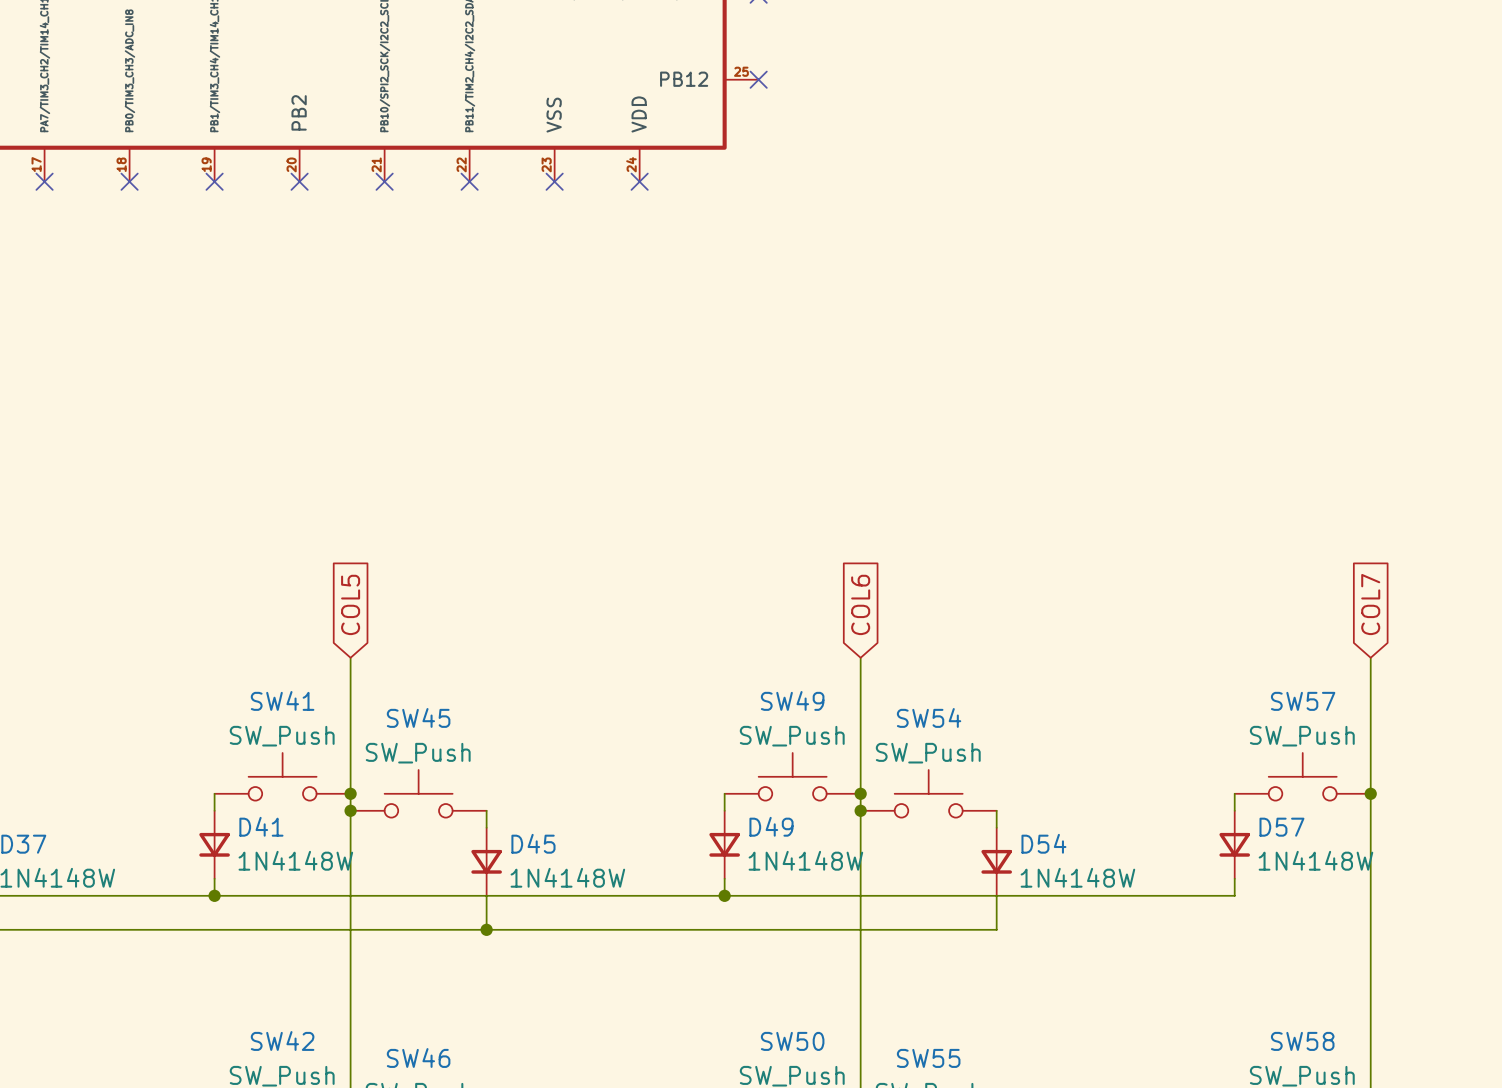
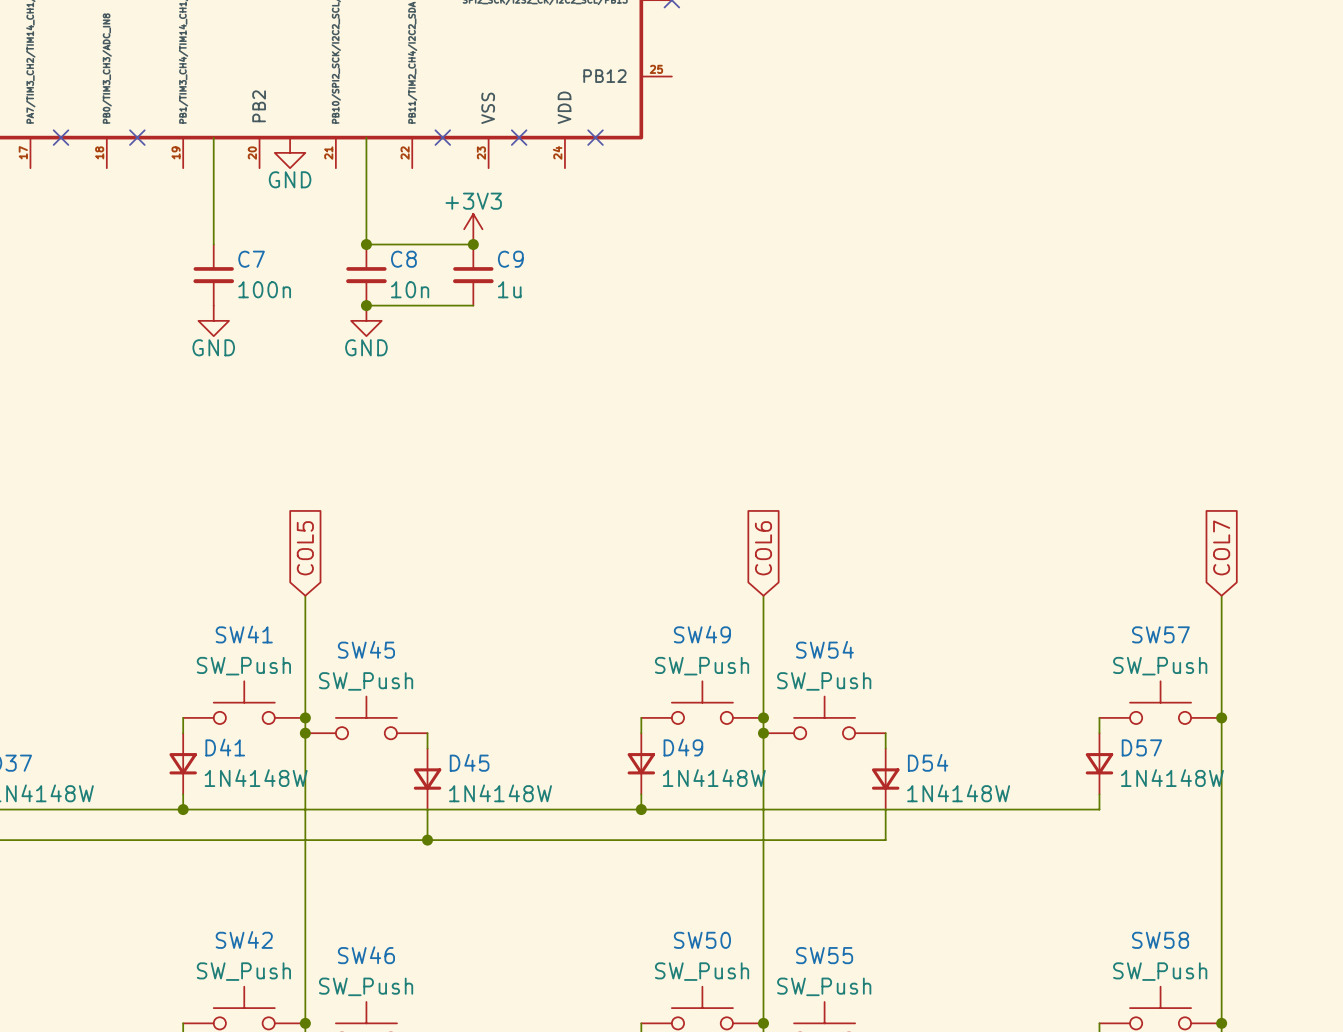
no-connect mark: (758, 79) -> none
no-connect mark: none -> (61, 137)
no-connect mark: none -> (137, 137)
wire: none -> (213, 137) (213, 244)
wire: none -> (366, 137) (366, 244) (473, 244)
no-connect mark: none -> (442, 137)
no-connect mark: none -> (519, 137)
no-connect mark: none -> (595, 137)
power symbol: none -> GND (290, 152)
no-connect mark: (44, 181) -> none
no-connect mark: (129, 181) -> none
no-connect mark: (214, 181) -> none
no-connect mark: (299, 181) -> none
no-connect mark: (384, 181) -> none
no-connect mark: (469, 181) -> none
no-connect mark: (554, 181) -> none
no-connect mark: (639, 181) -> none
power symbol: none -> +3V3 (473, 229)
junction: none -> (366, 244)
junction: none -> (473, 244)
C7: none -> 100n (213, 275)
C8: none -> 10n (366, 275)
C9: none -> 1u (473, 275)
wire: none -> (366, 305) (473, 305)
junction: none -> (366, 305)
power symbol: none -> GND (213, 320)
power symbol: none -> GND (366, 320)

